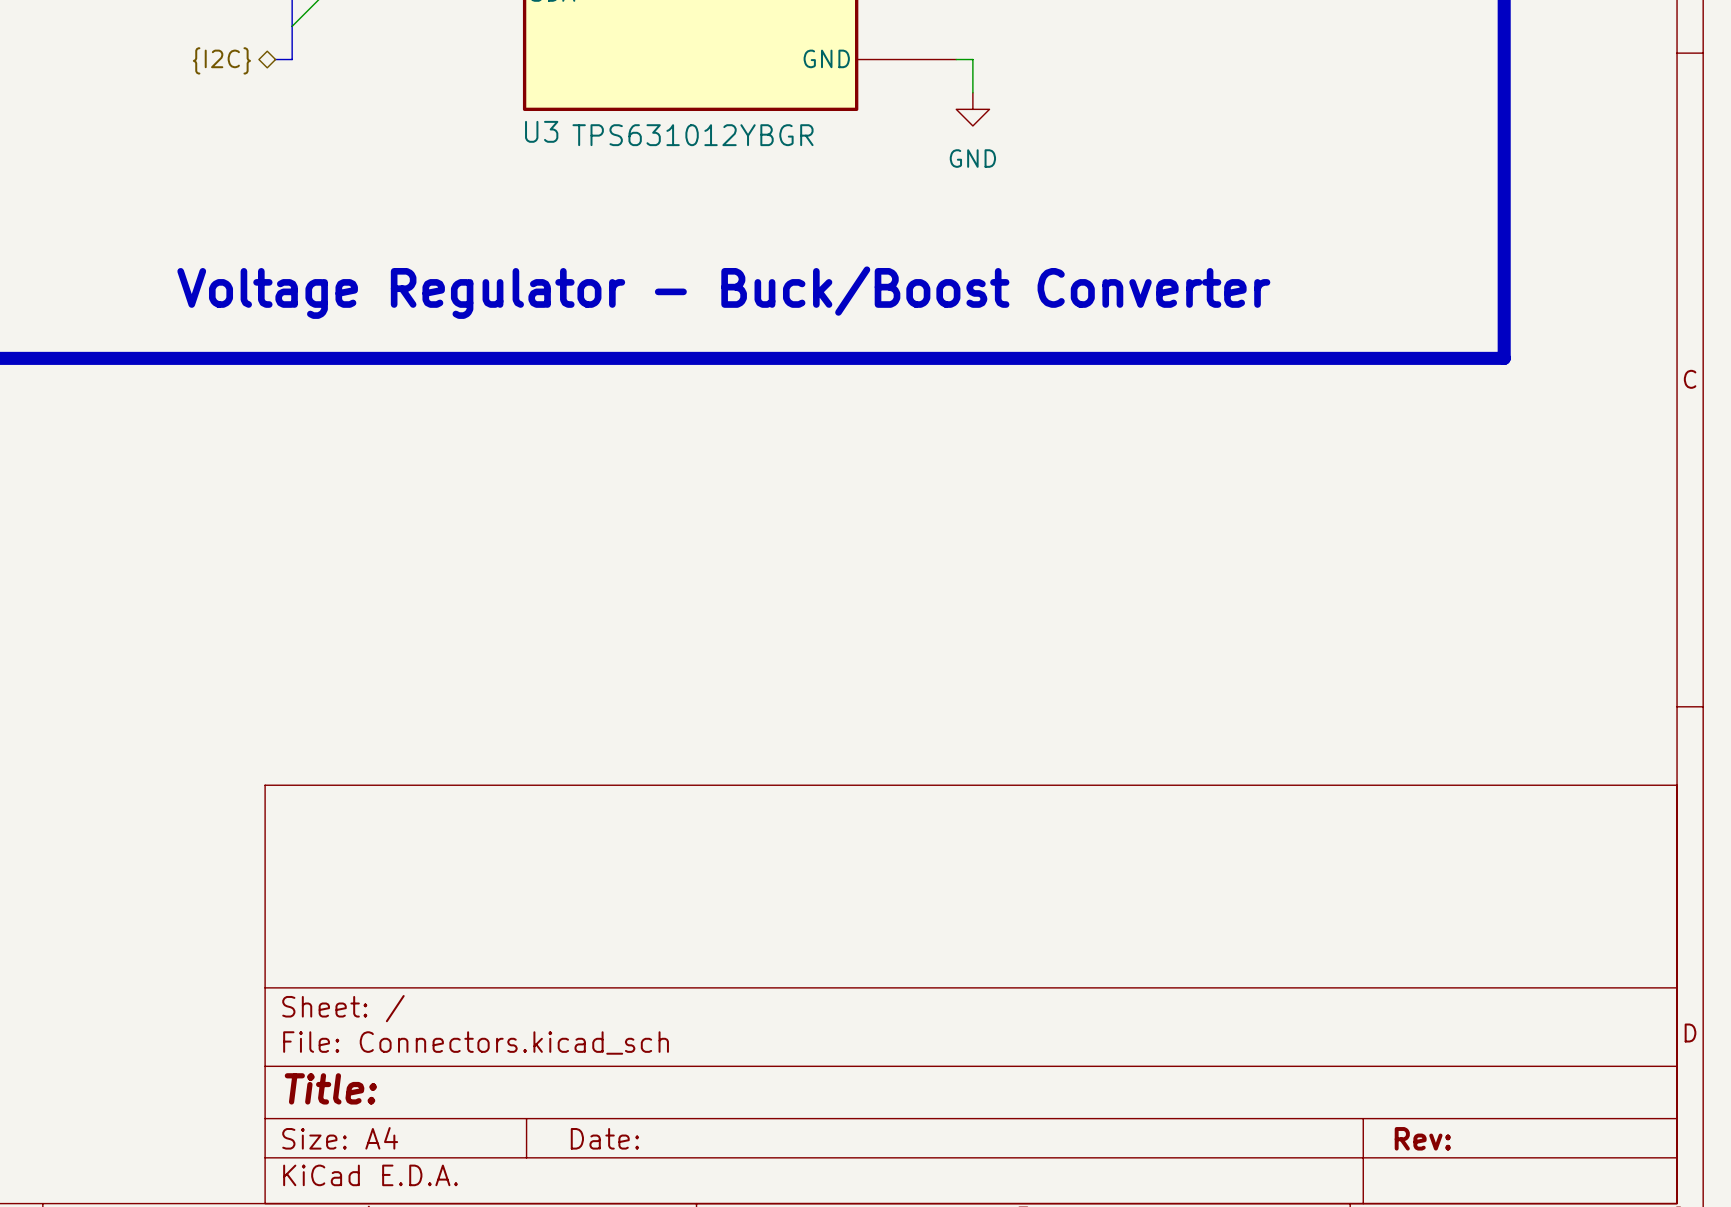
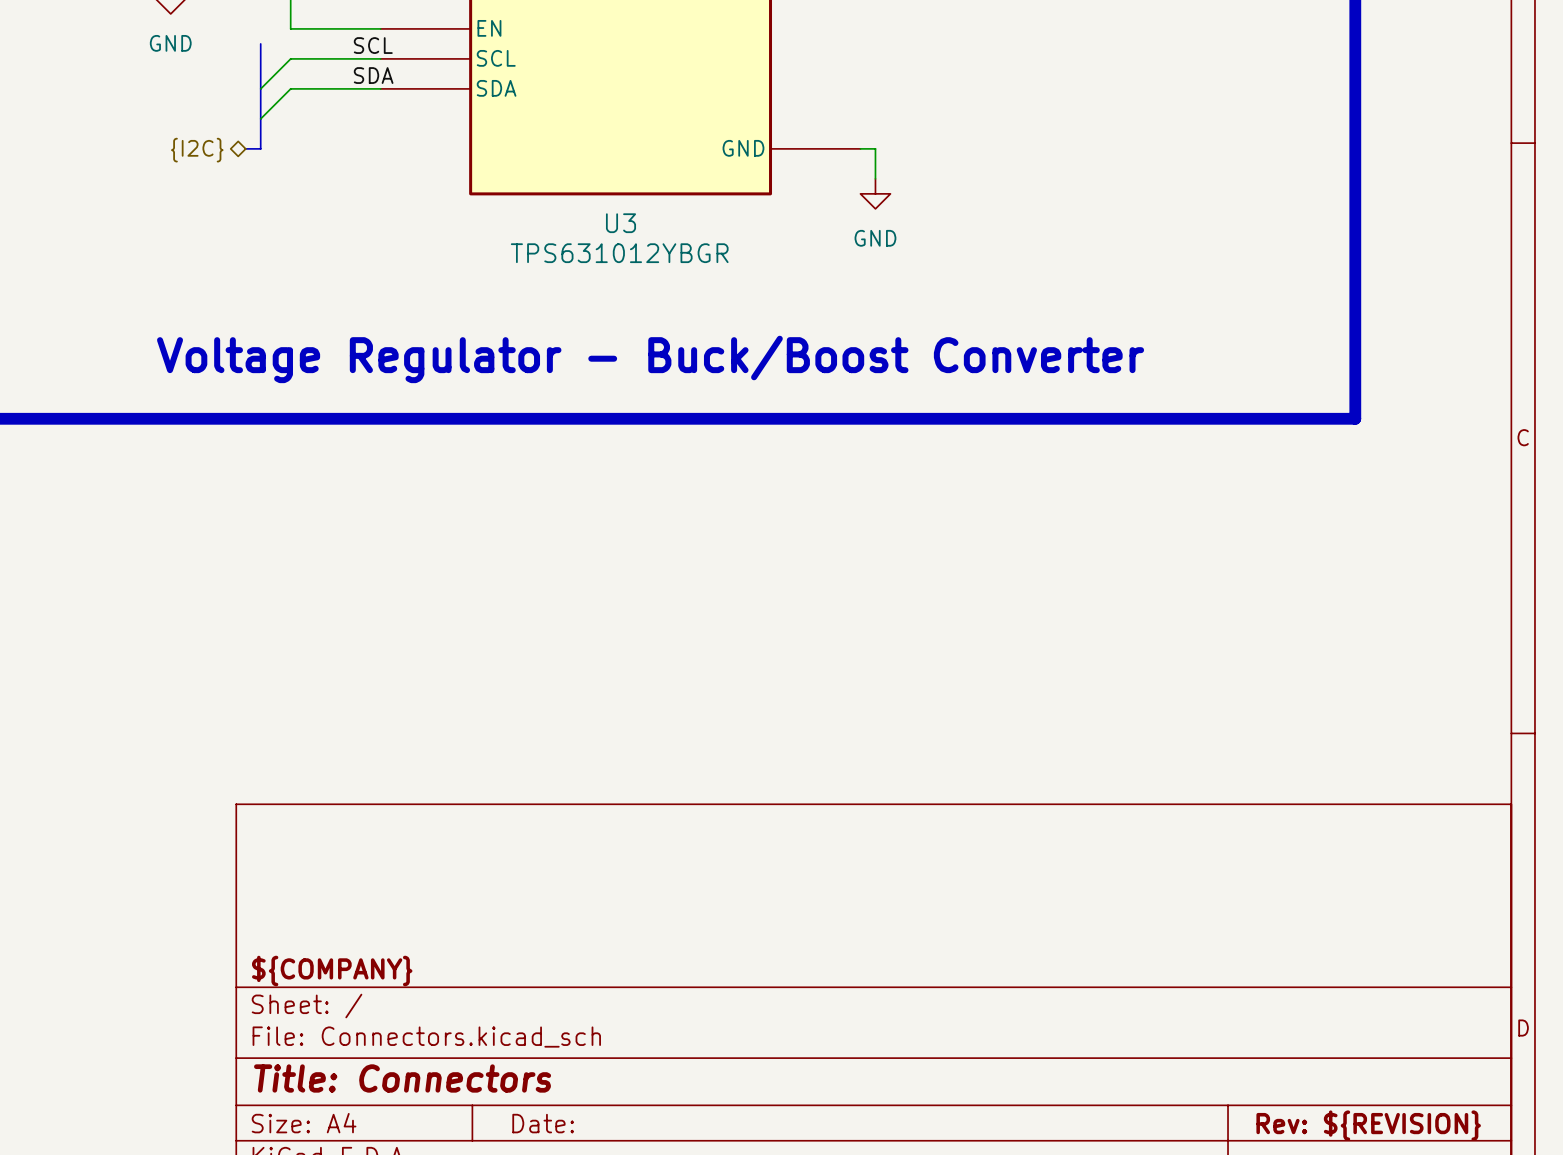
U3 name position: U3 (541, 131) -> U3 (621, 223)
U3 value position: TPS631012YBGR (693, 135) -> TPS631012YBGR (619, 253)
title block: none -> ${COMPANY} (332, 971)
title block: Title: (330, 1088) -> Title: Connectors (402, 1078)
title block: Rev: (1422, 1138) -> Rev: ${REVISION} (1368, 1125)

